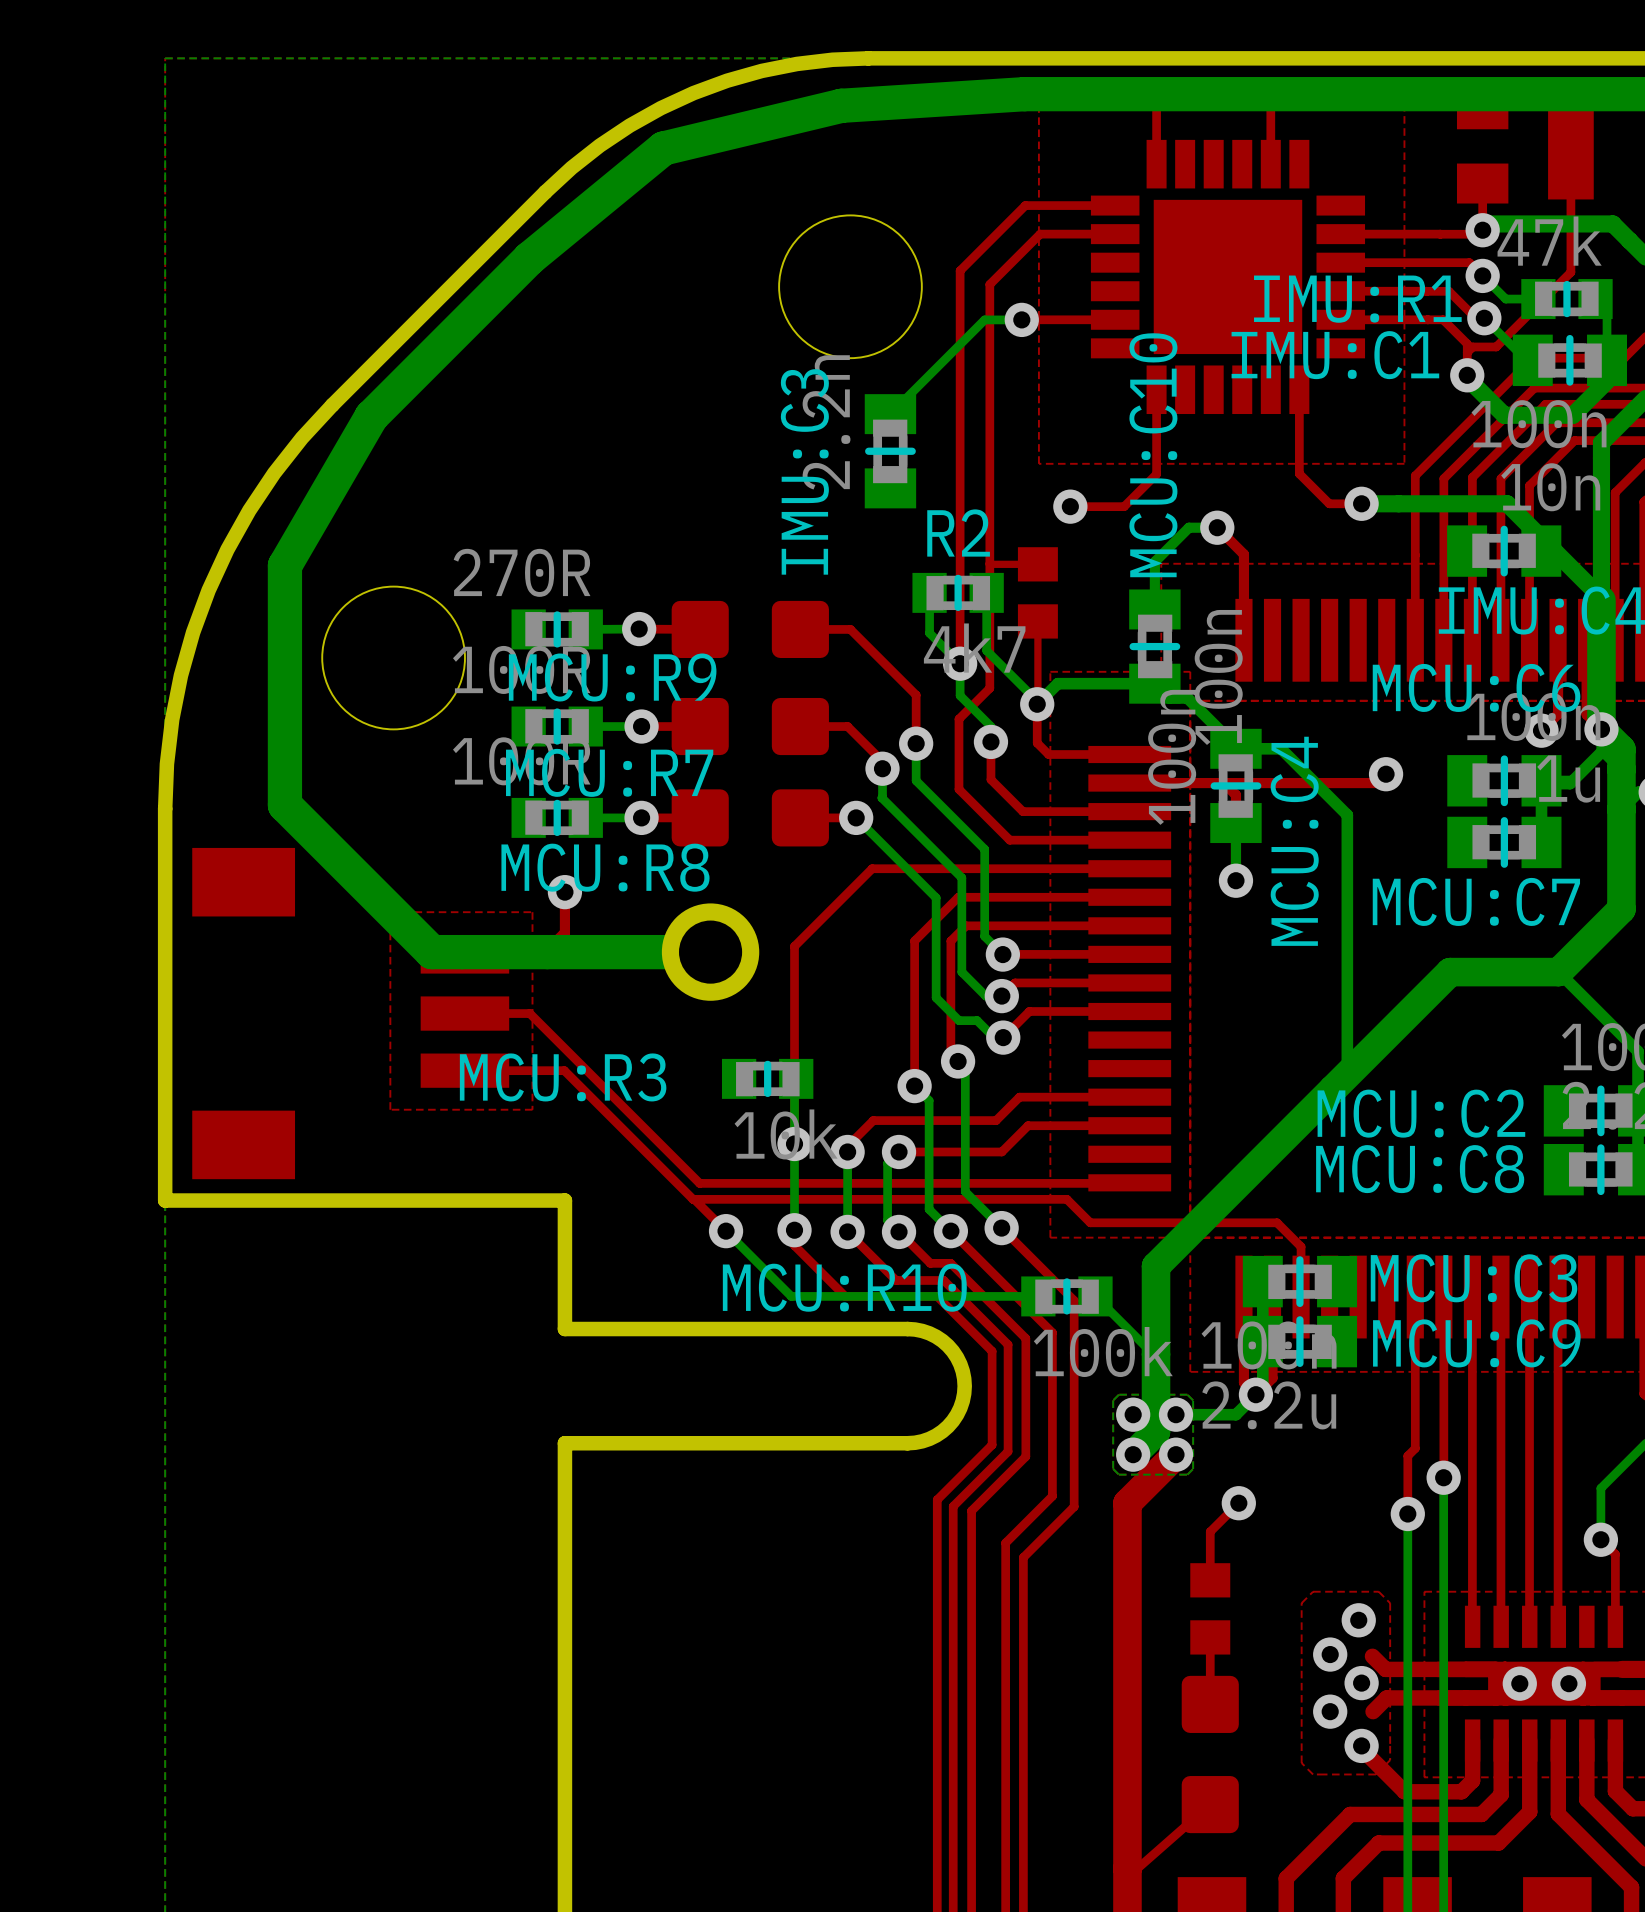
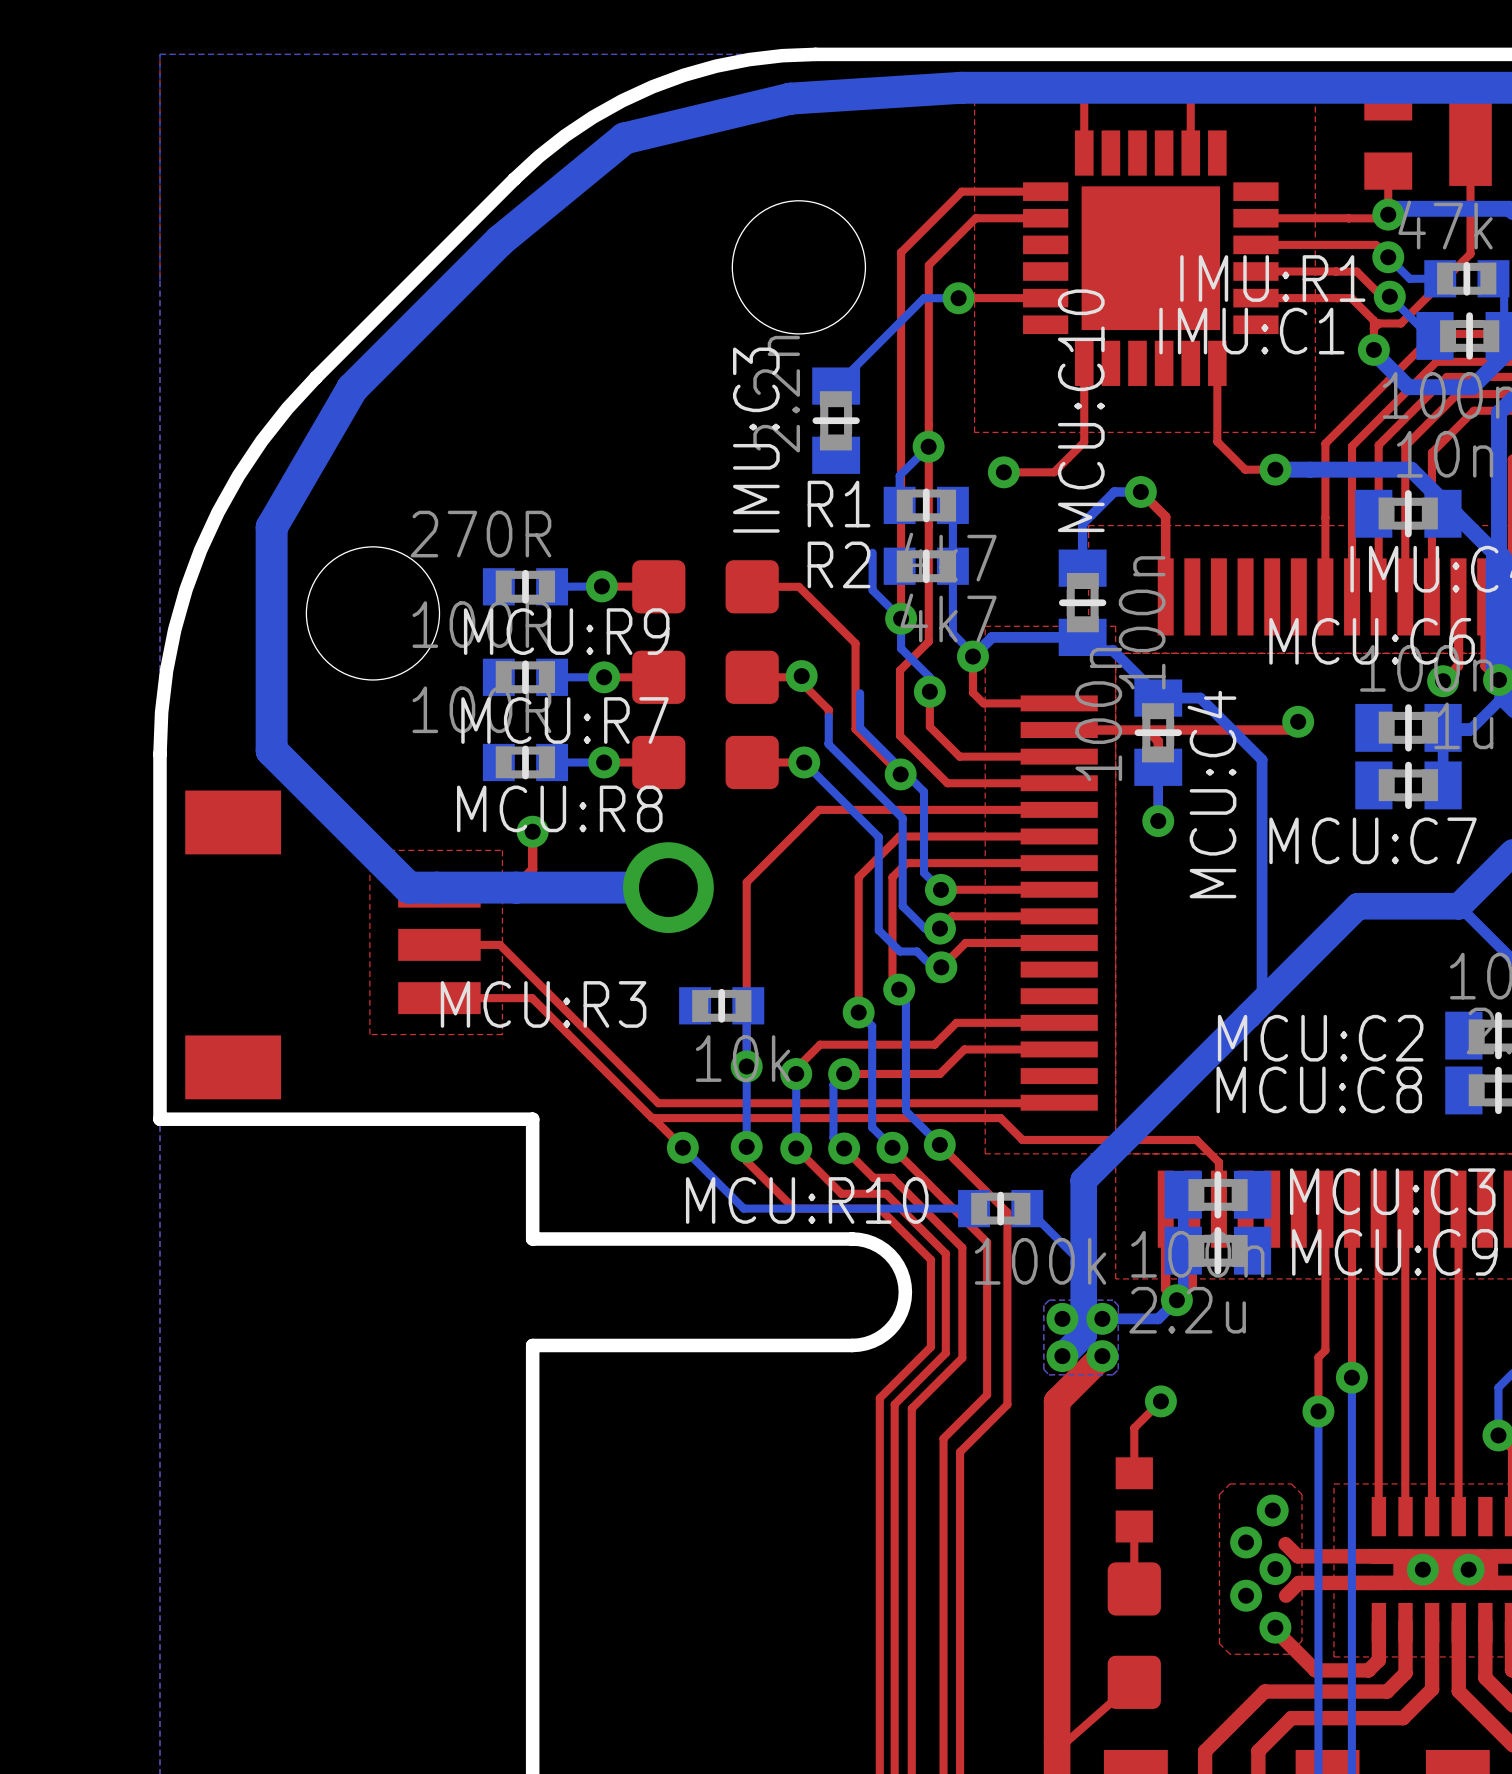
bottom track: none -> (928, 446) (899, 475) (899, 505)
via: none -> (928, 446)
R2 name position: R2 (958, 533) -> R2 (839, 564)
top track: (1037, 564) (990, 564) -> none
R2 position: (958, 592) -> (926, 566)
bottom track: (986, 592) (986, 650) (1015, 679) -> (952, 505) (952, 633)
R1 side: top (1037, 592) -> bottom (926, 505)
top track: (1037, 621) (1037, 703) -> none
top track: (911, 690) (916, 695) (916, 743) -> (855, 643) (855, 729) (900, 774)
via: none -> (801, 676)
via: (916, 743) -> none
via: (882, 768) -> none
via: none -> (900, 774)

